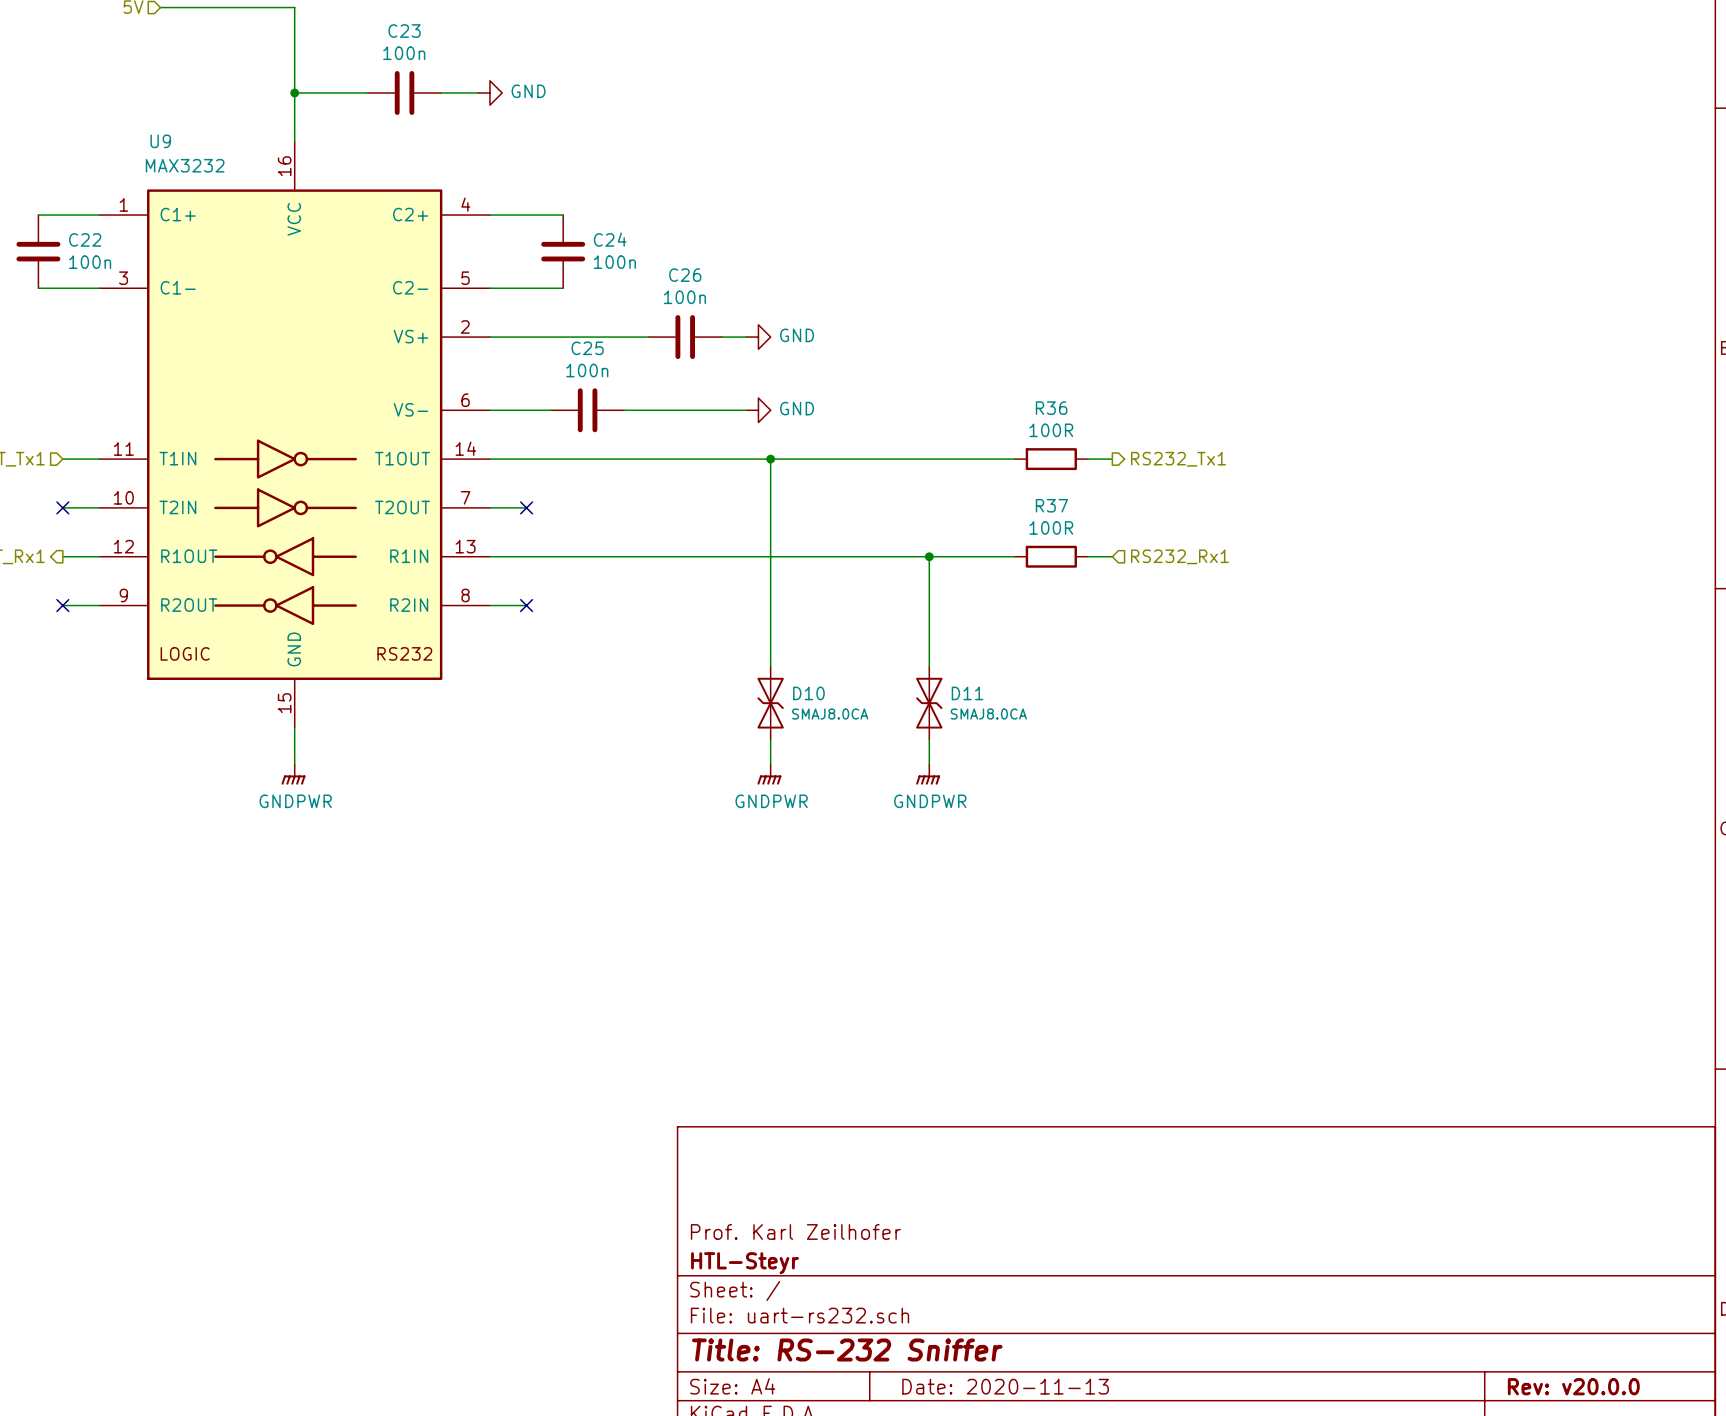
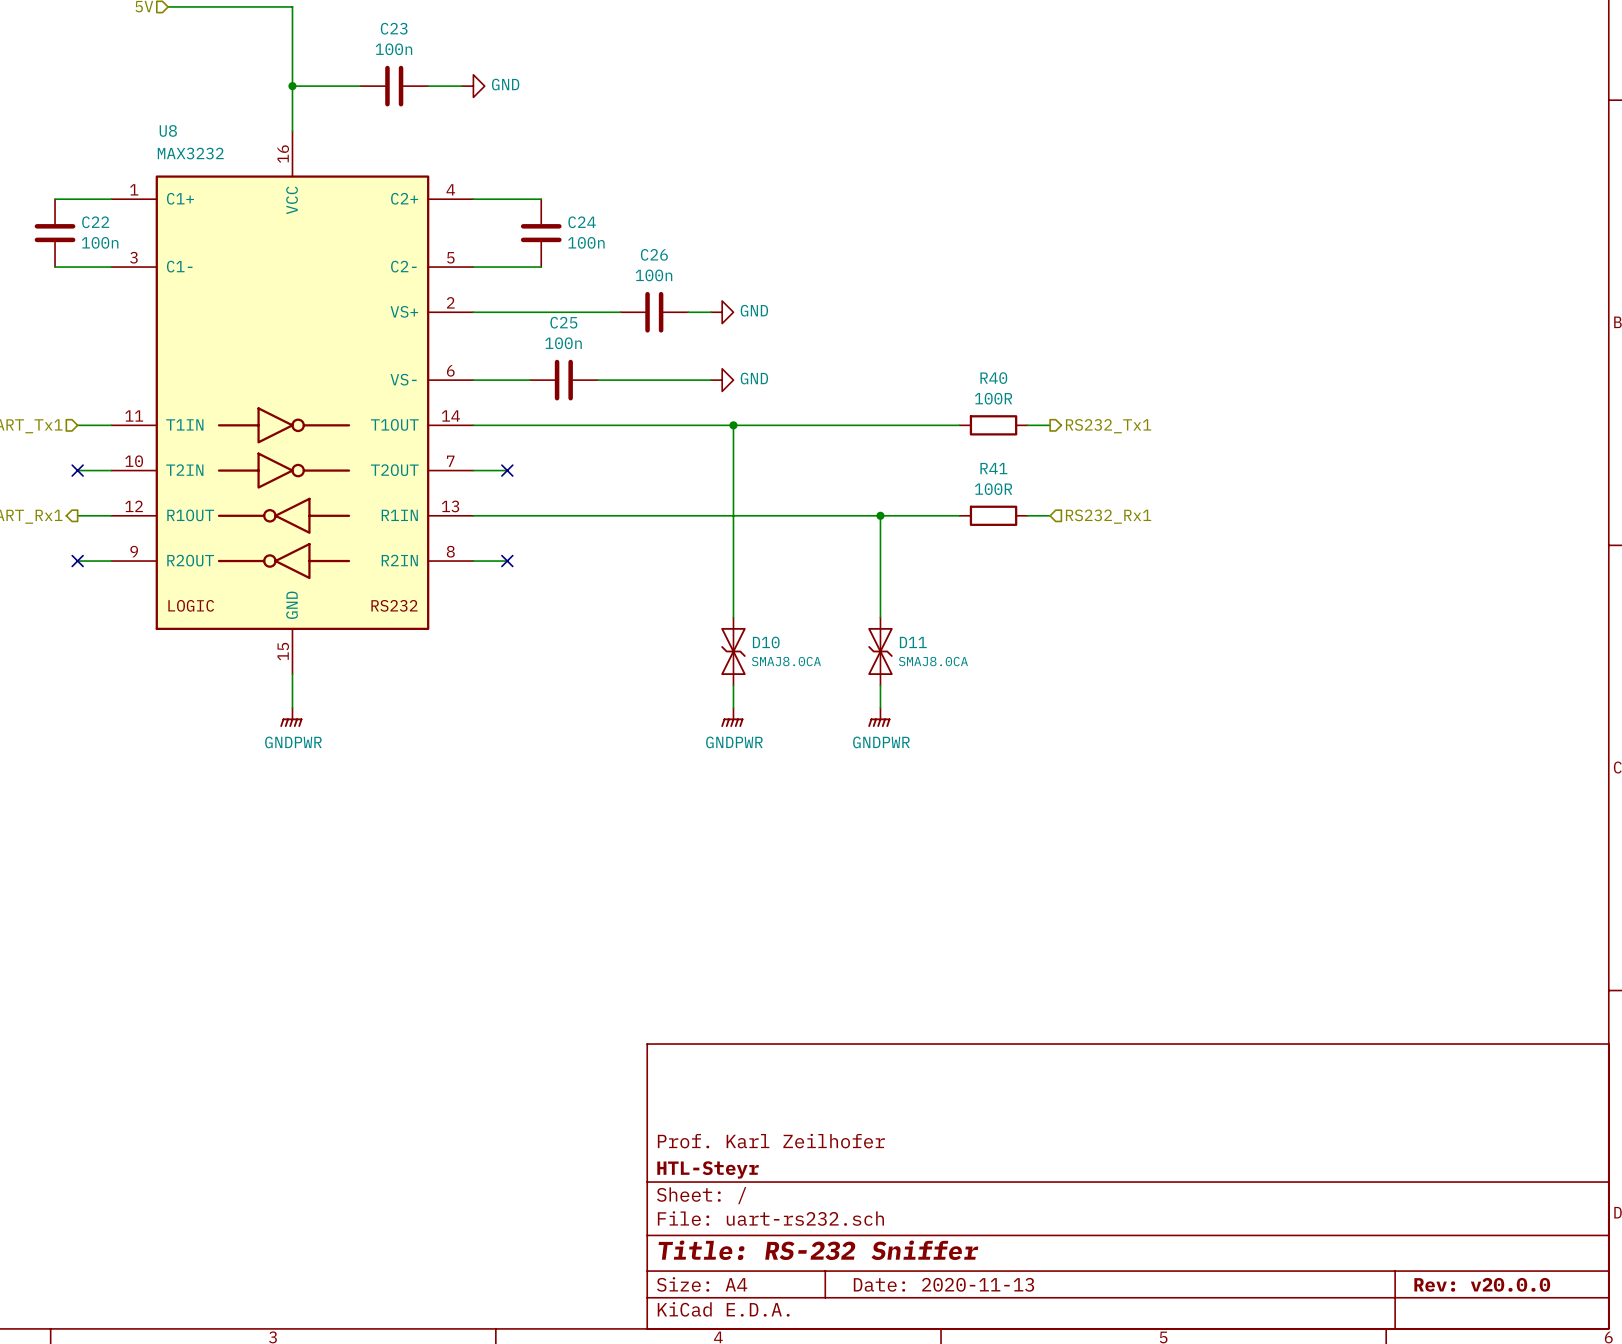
U9 name: U9 (160, 141) -> U8 (168, 130)
R36 name: R36 (1051, 408) -> R40 (993, 378)
R37 name: R37 (1051, 505) -> R41 (993, 468)

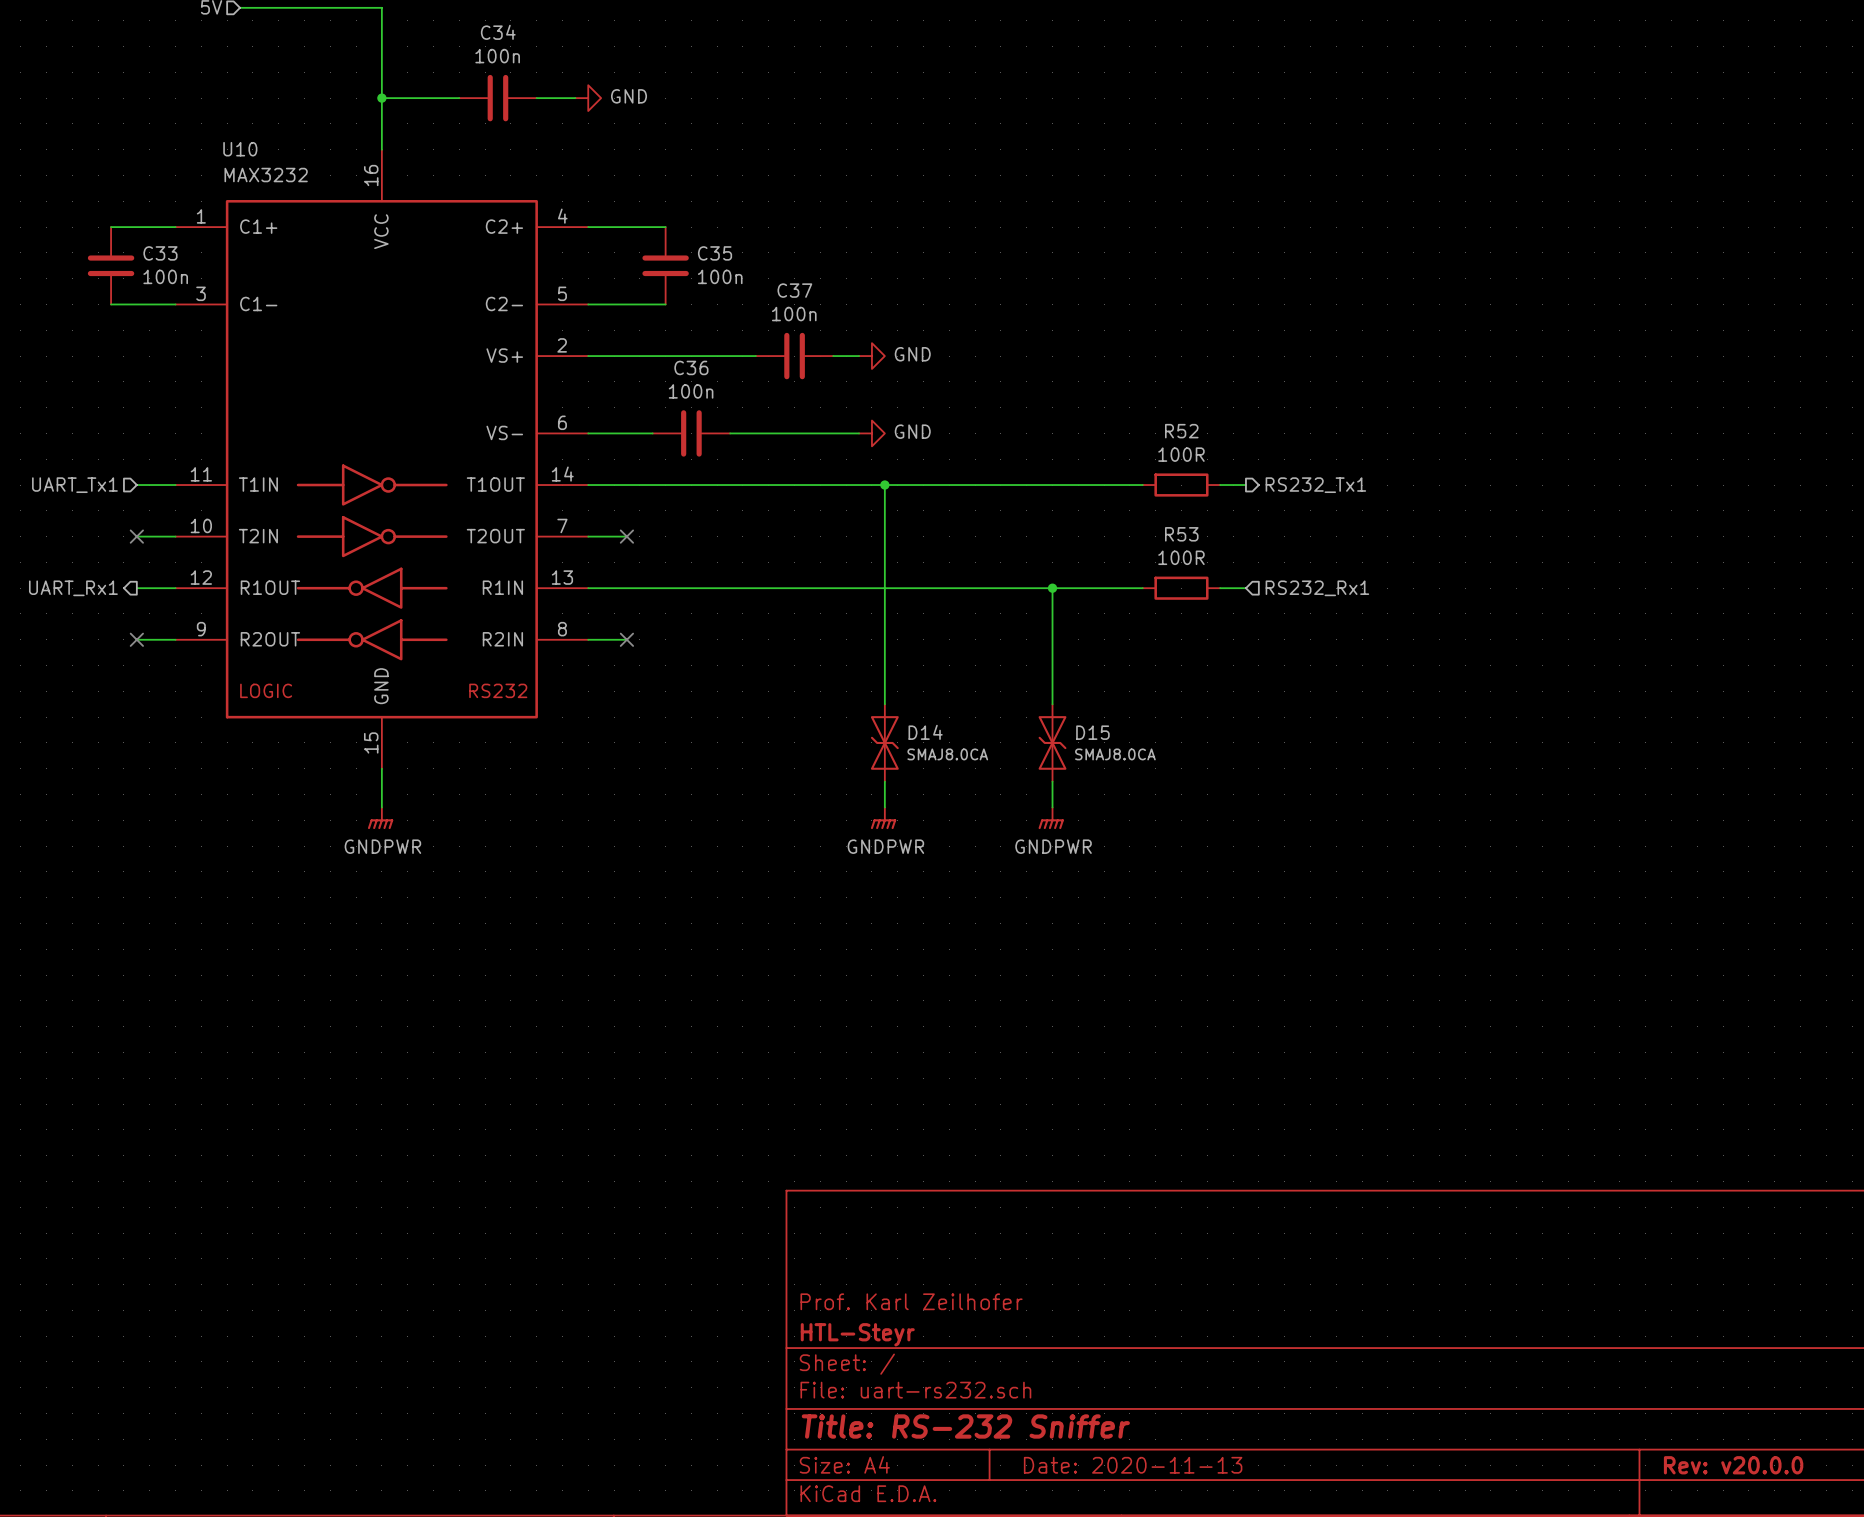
C23 name: C23 (394, 28) -> C34 (498, 32)
U8 name: U8 (168, 130) -> U10 (240, 149)
C22 name: C22 (95, 222) -> C33 (160, 253)
C24 name: C24 (582, 222) -> C35 (715, 253)
C26 name: C26 (654, 254) -> C37 (794, 290)
C25 name: C25 (563, 322) -> C36 (691, 367)
R40 name: R40 (993, 378) -> R52 (1181, 431)
R41 name: R41 (993, 468) -> R53 (1181, 534)
D10 name: D10 (766, 642) -> D14 (925, 732)
D11 name: D11 (913, 642) -> D15 (1092, 732)

